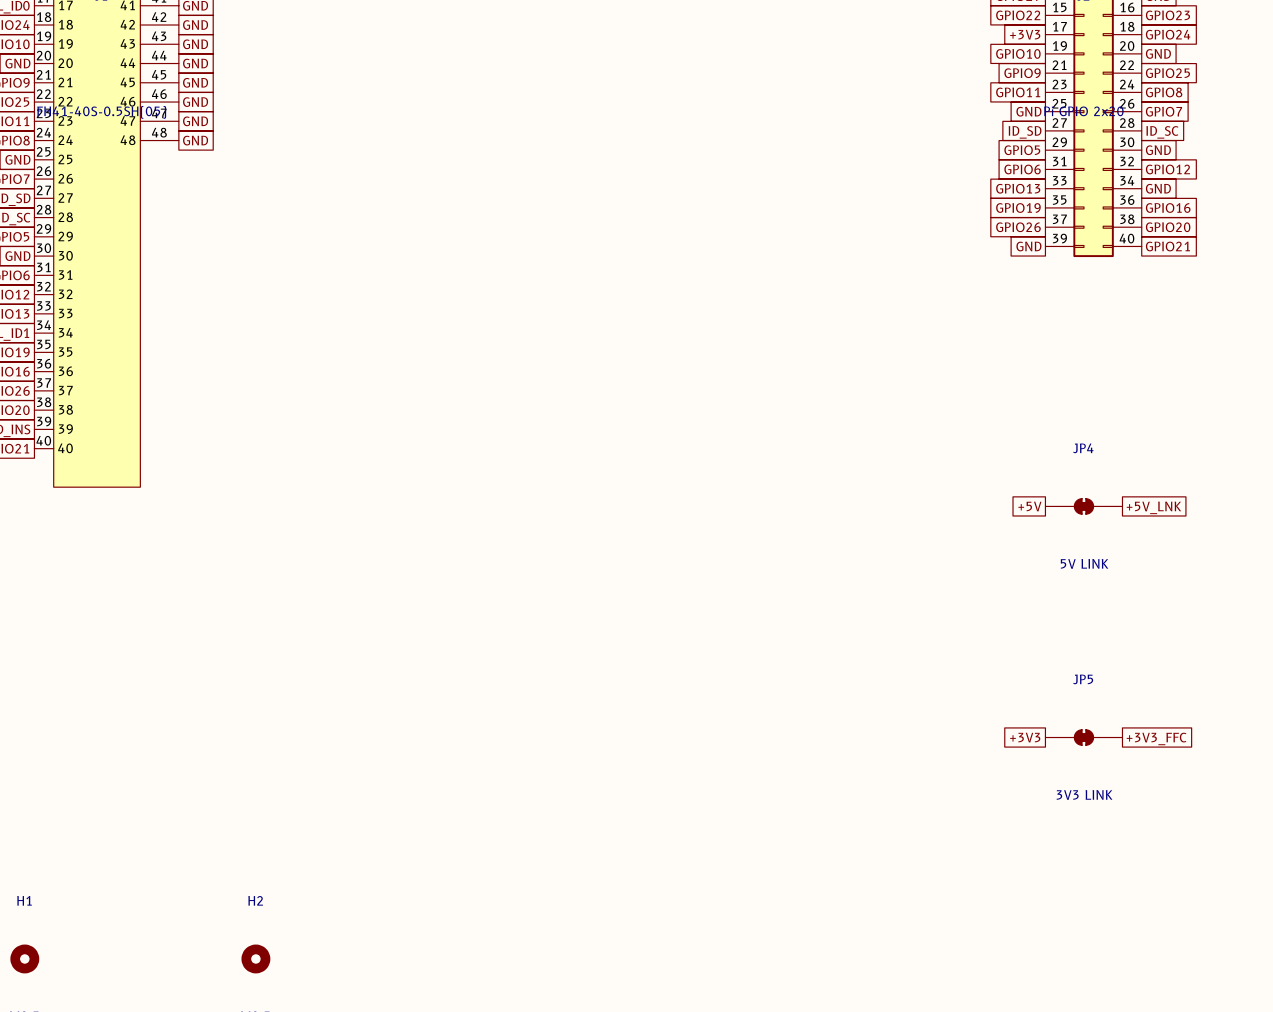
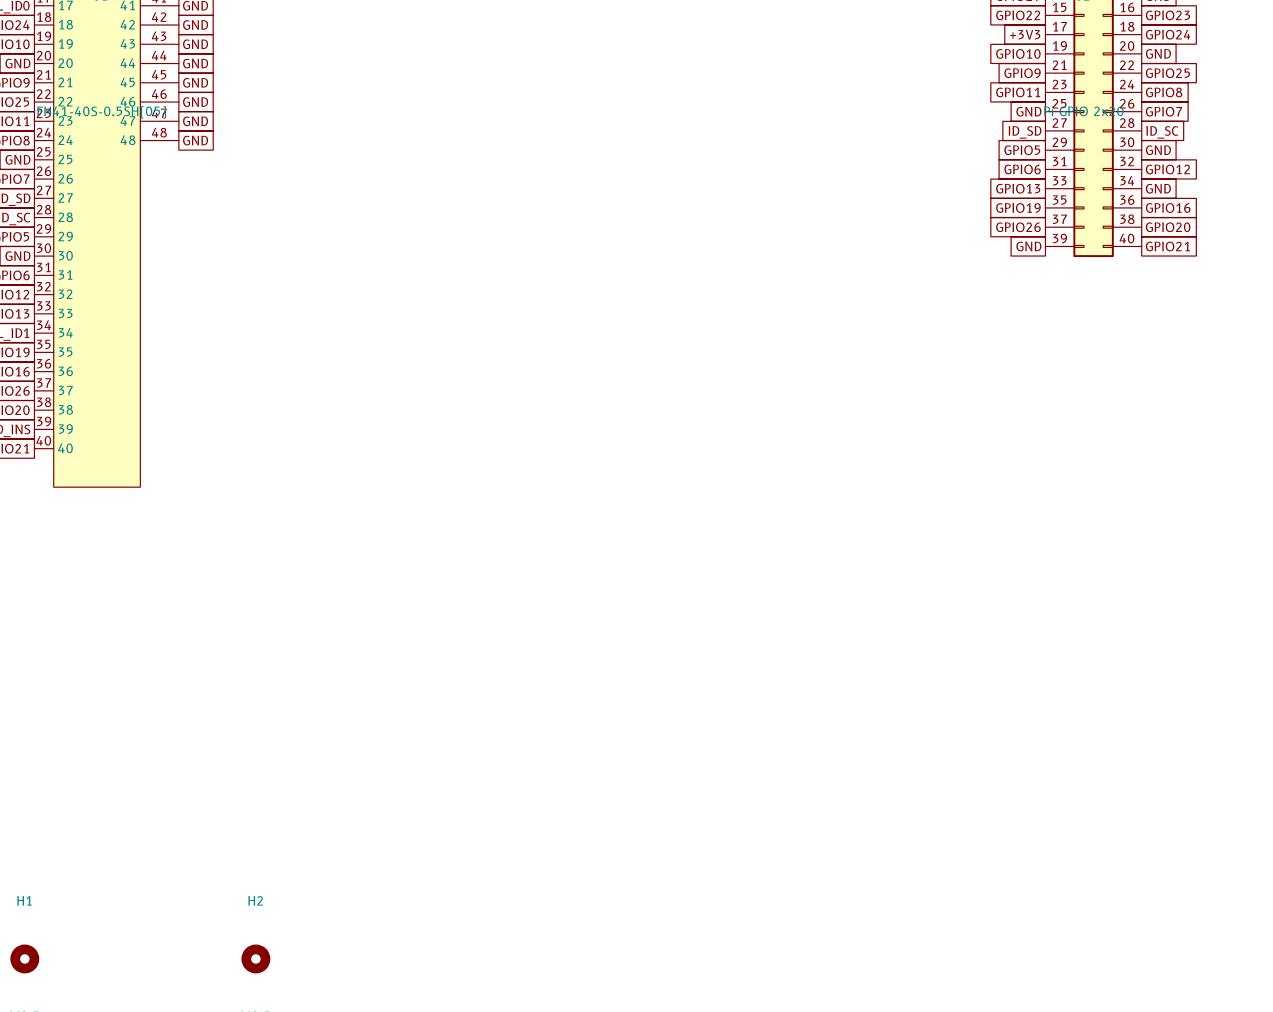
global label: +5V (1029, 506) -> none
JP4: 5V LINK (1083, 506) -> none
global label: +5V_LNK (1153, 507) -> none
global label: +3V3 (1025, 737) -> none
JP5: 3V3 LINK (1083, 737) -> none
global label: +3V3_FFC (1156, 738) -> none

